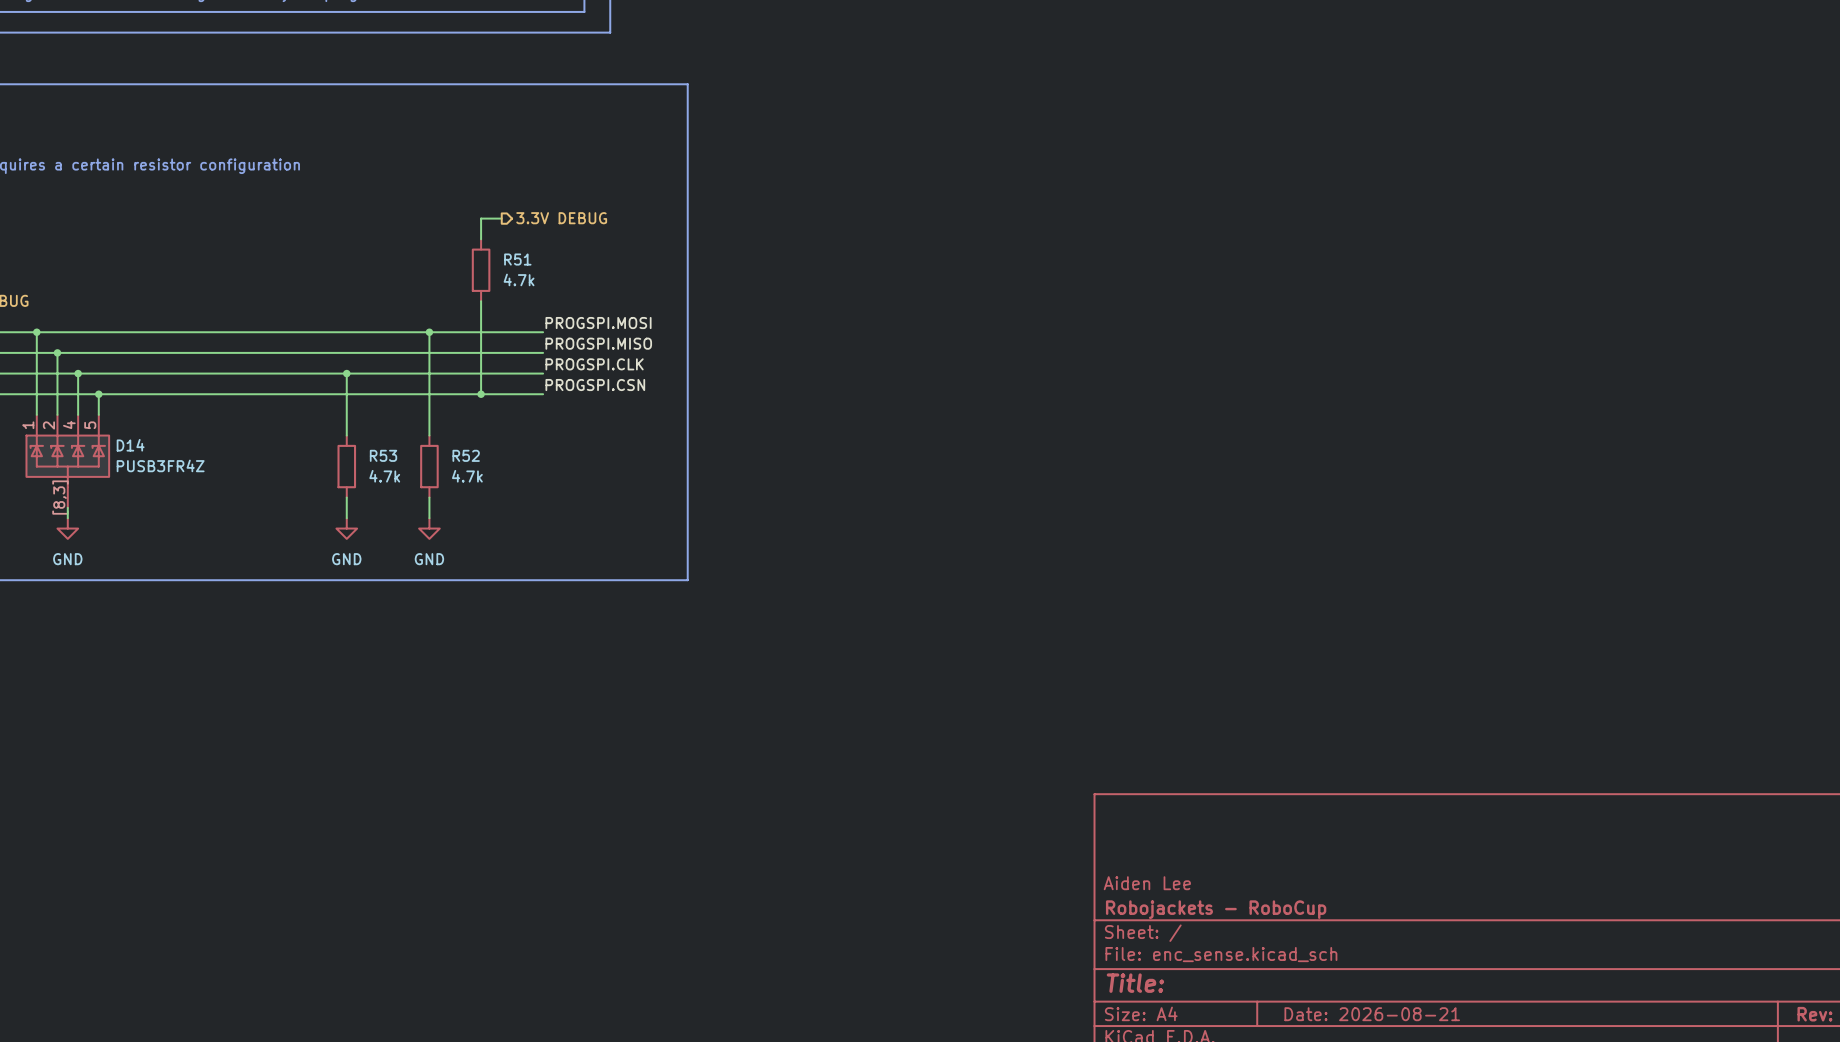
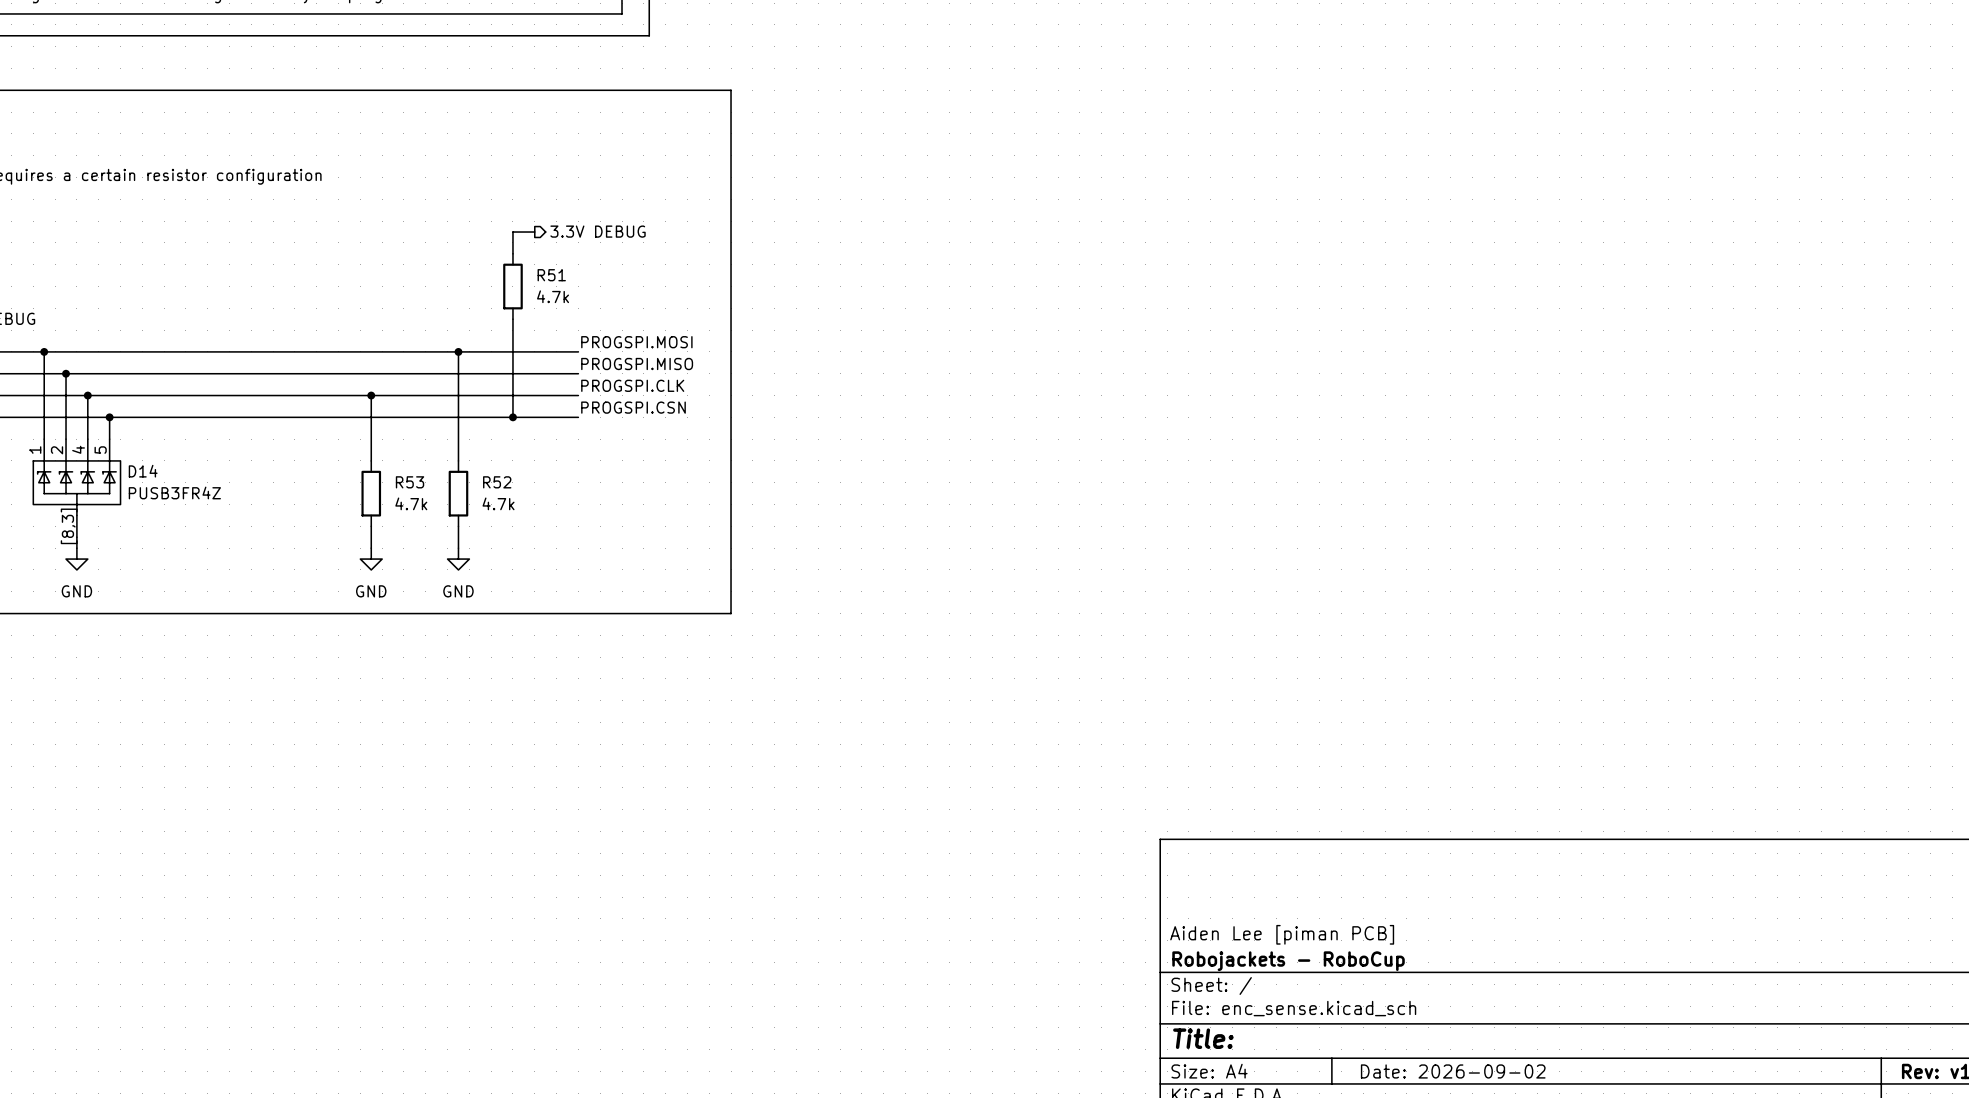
title block: Aiden Lee (1147, 883) -> Aiden Lee [piman PCB] (1282, 934)
title block: Date: 2026-08-21 (1372, 1014) -> Date: 2026-09-02 (1453, 1071)

